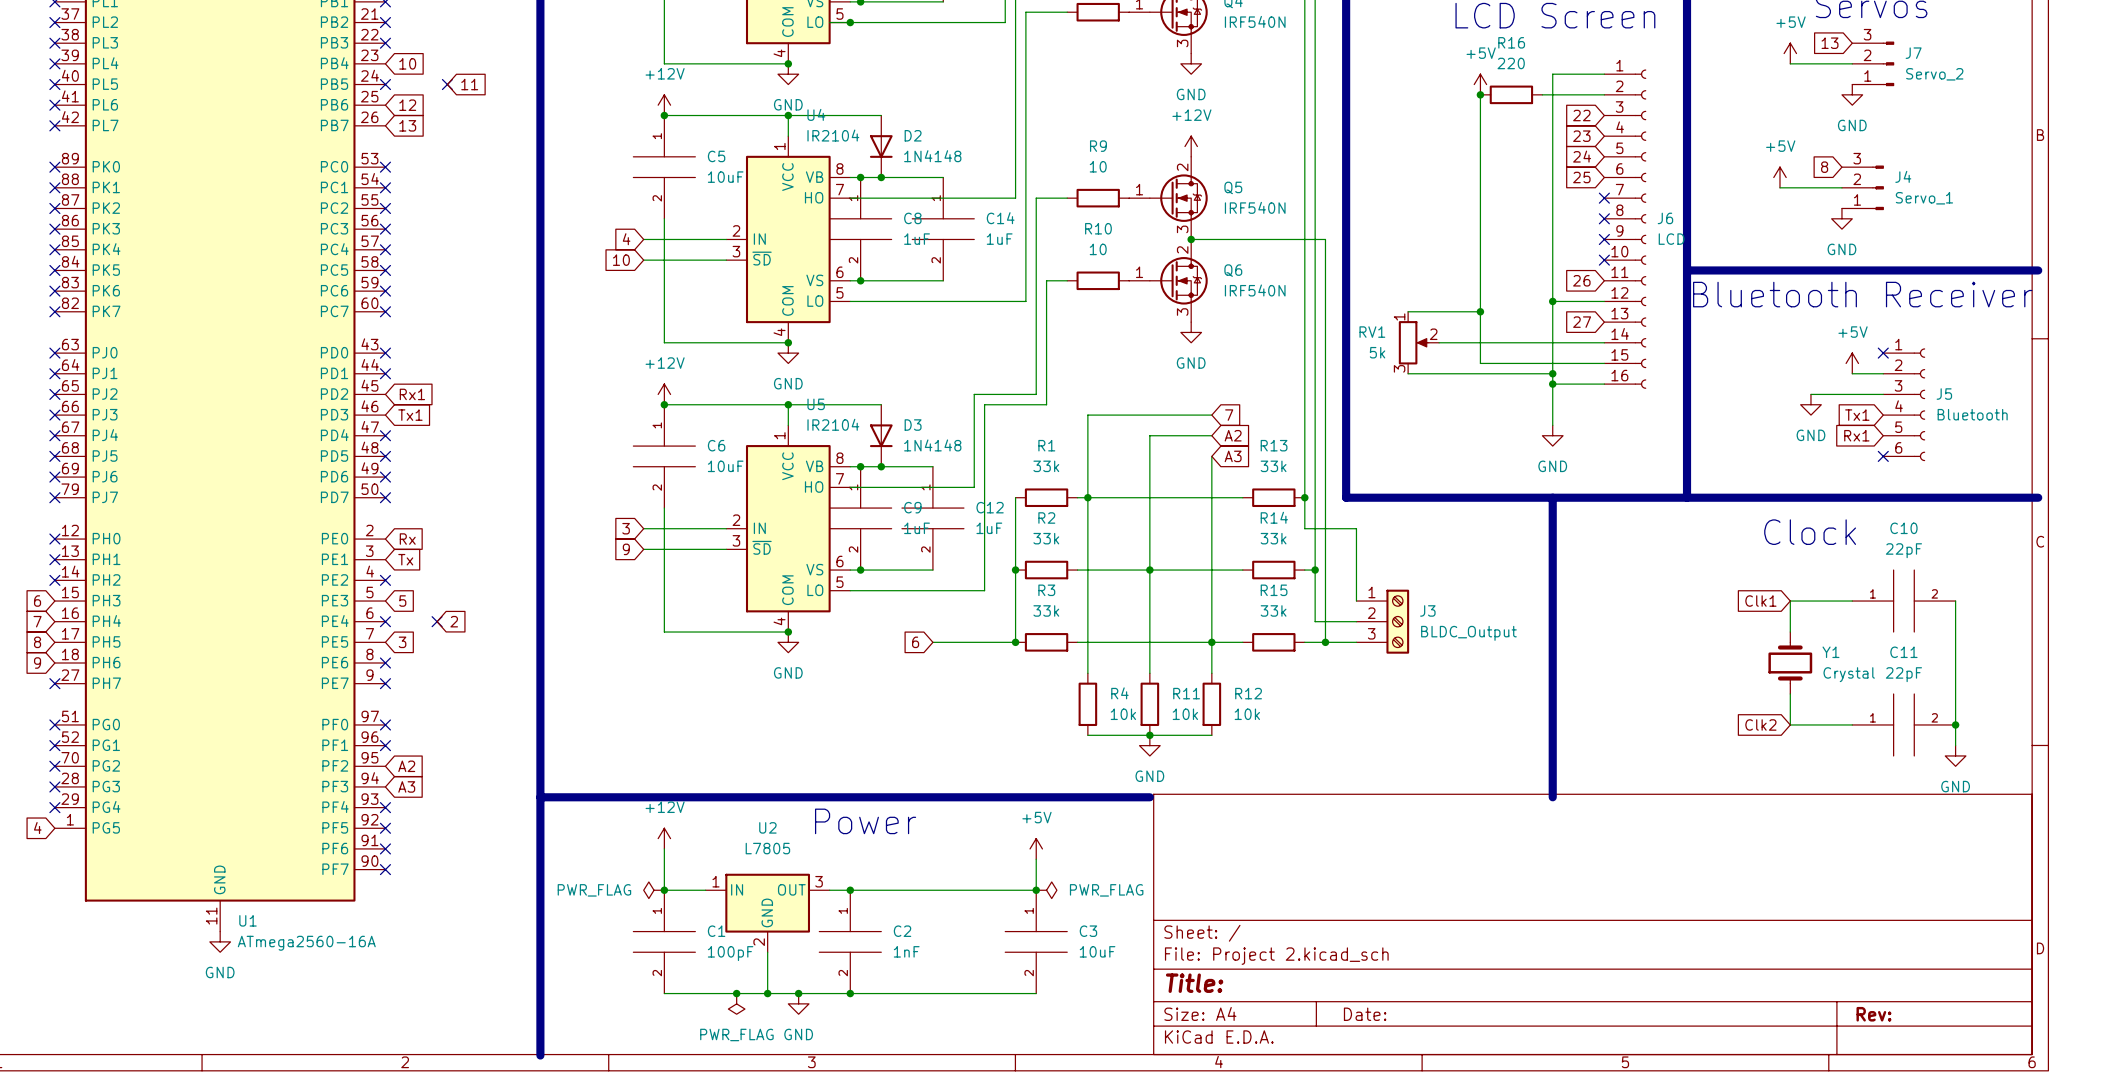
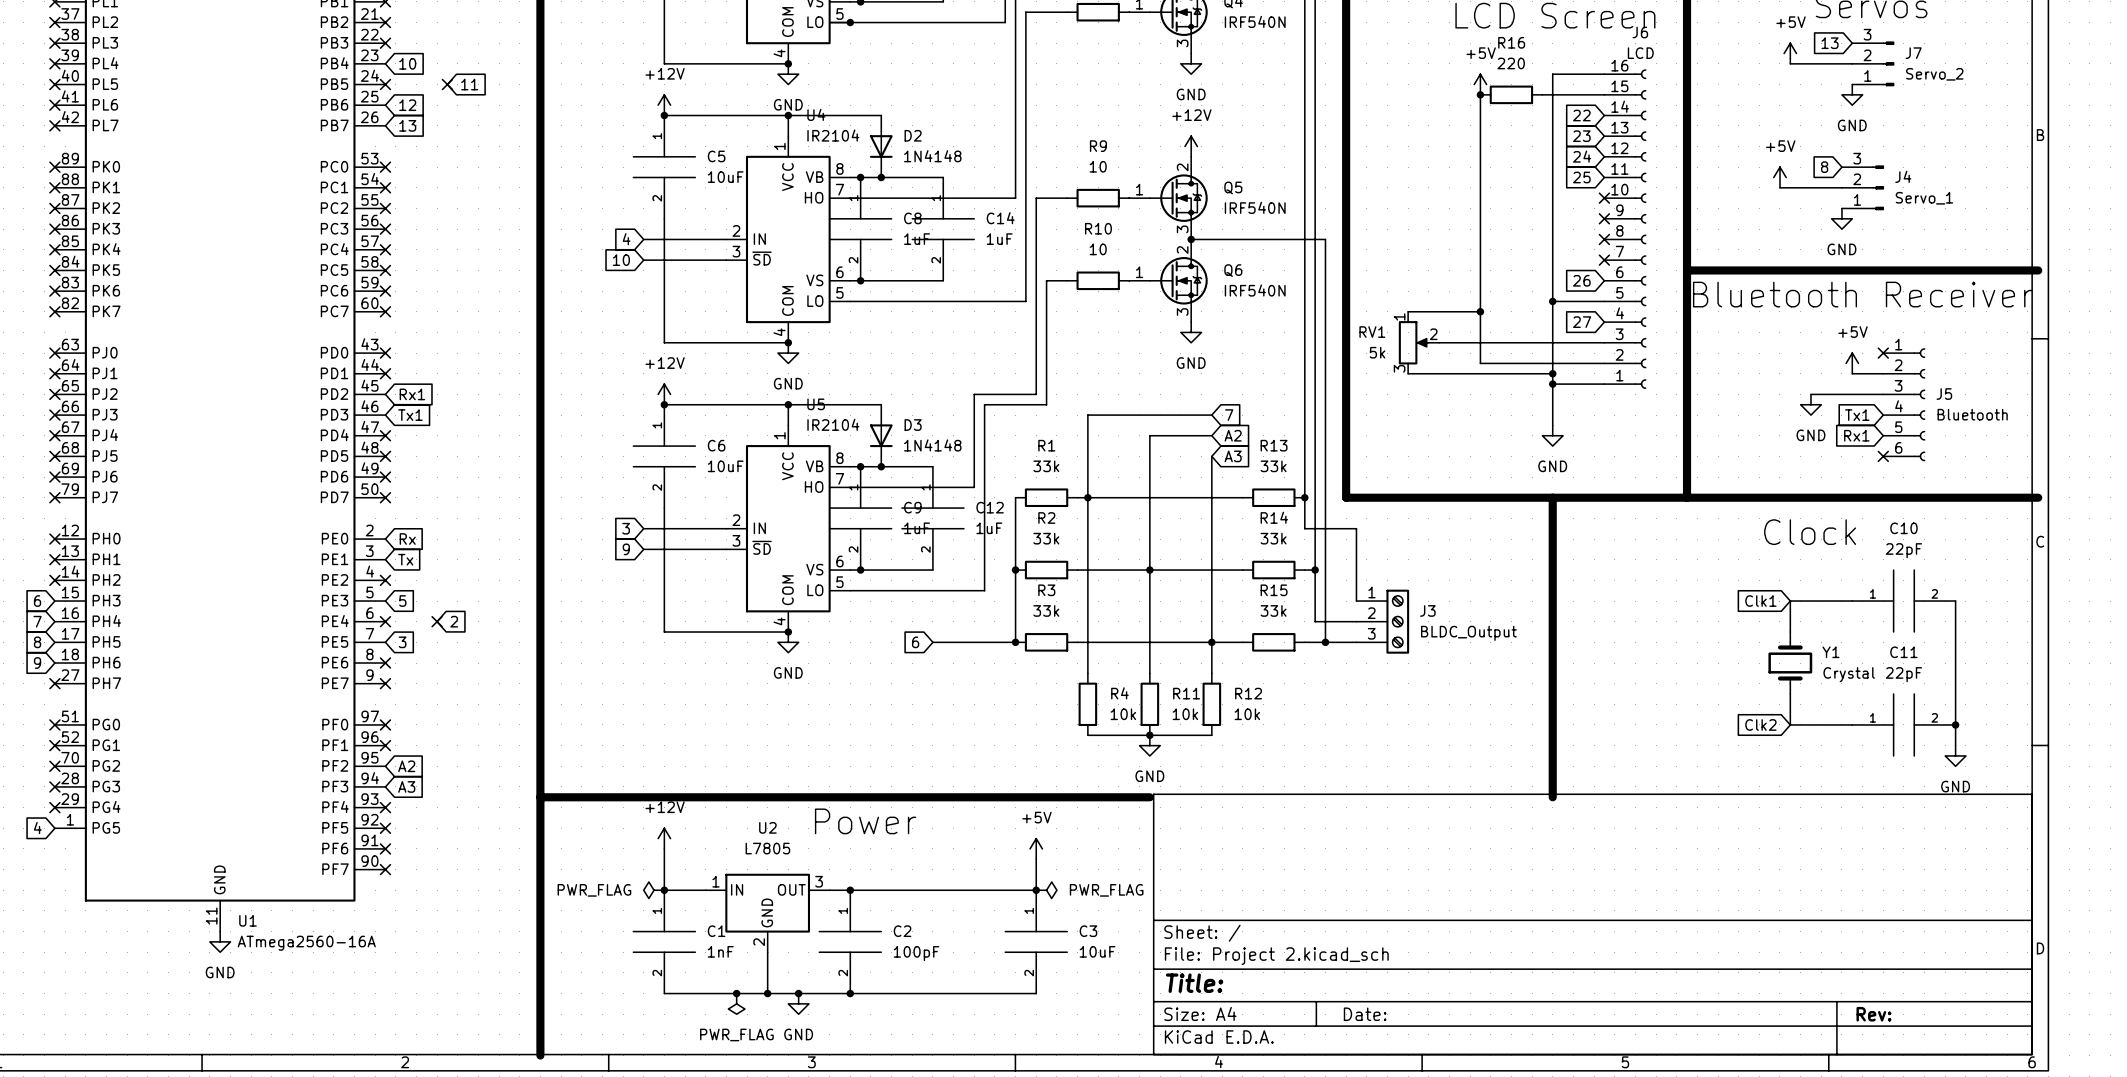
J6 name position: J6 (1665, 218) -> J6 (1640, 32)
J6 flip: as is (1640, 229) -> up-down (1640, 229)
J6 value position: LCD (1671, 239) -> LCD (1640, 53)
C2 value: 1nF (906, 951) -> 100pF (916, 953)
C1 value: 100pF (730, 953) -> 1nF (720, 951)

